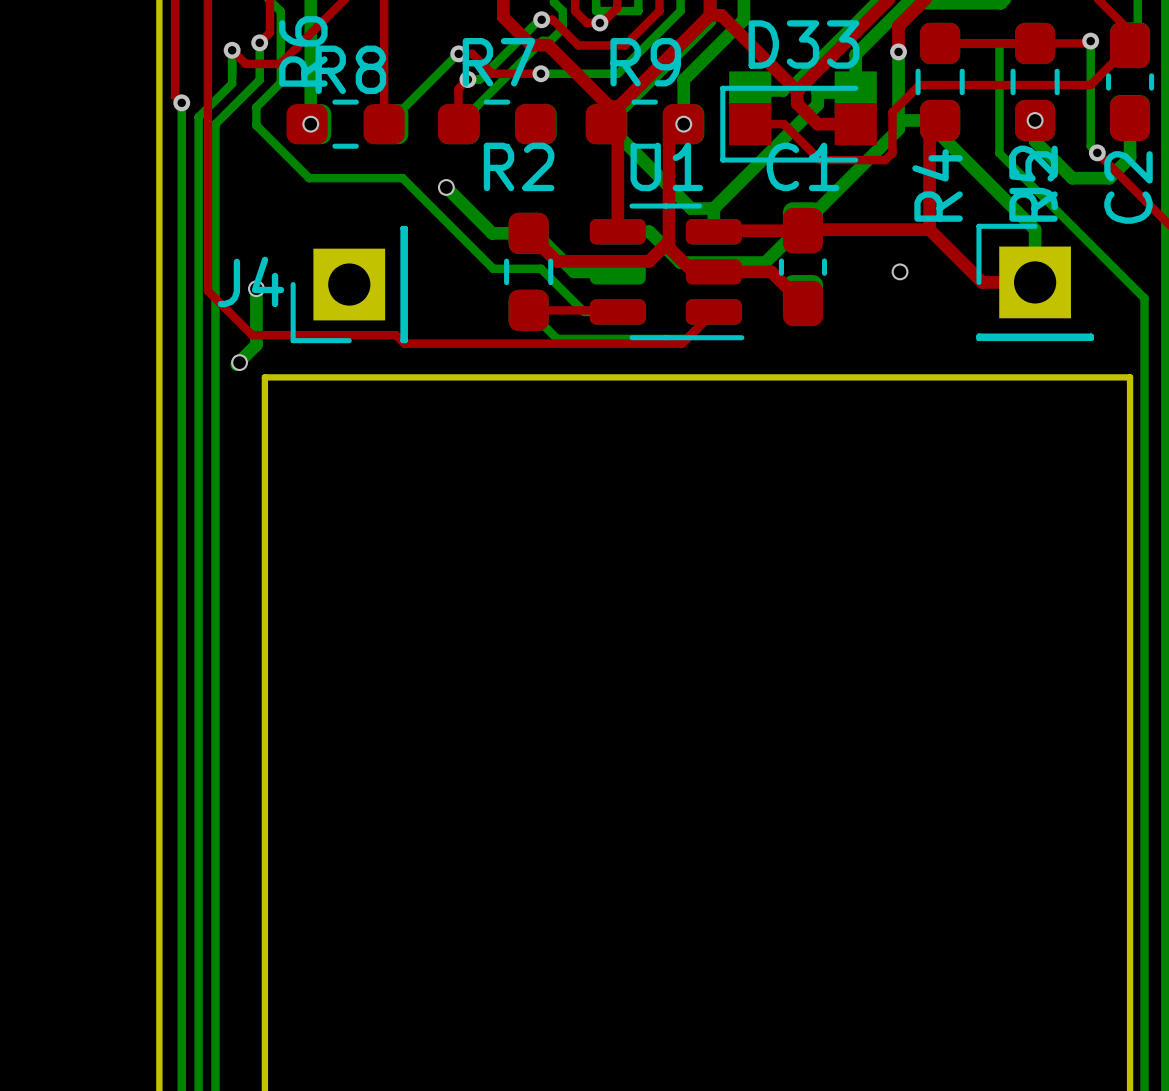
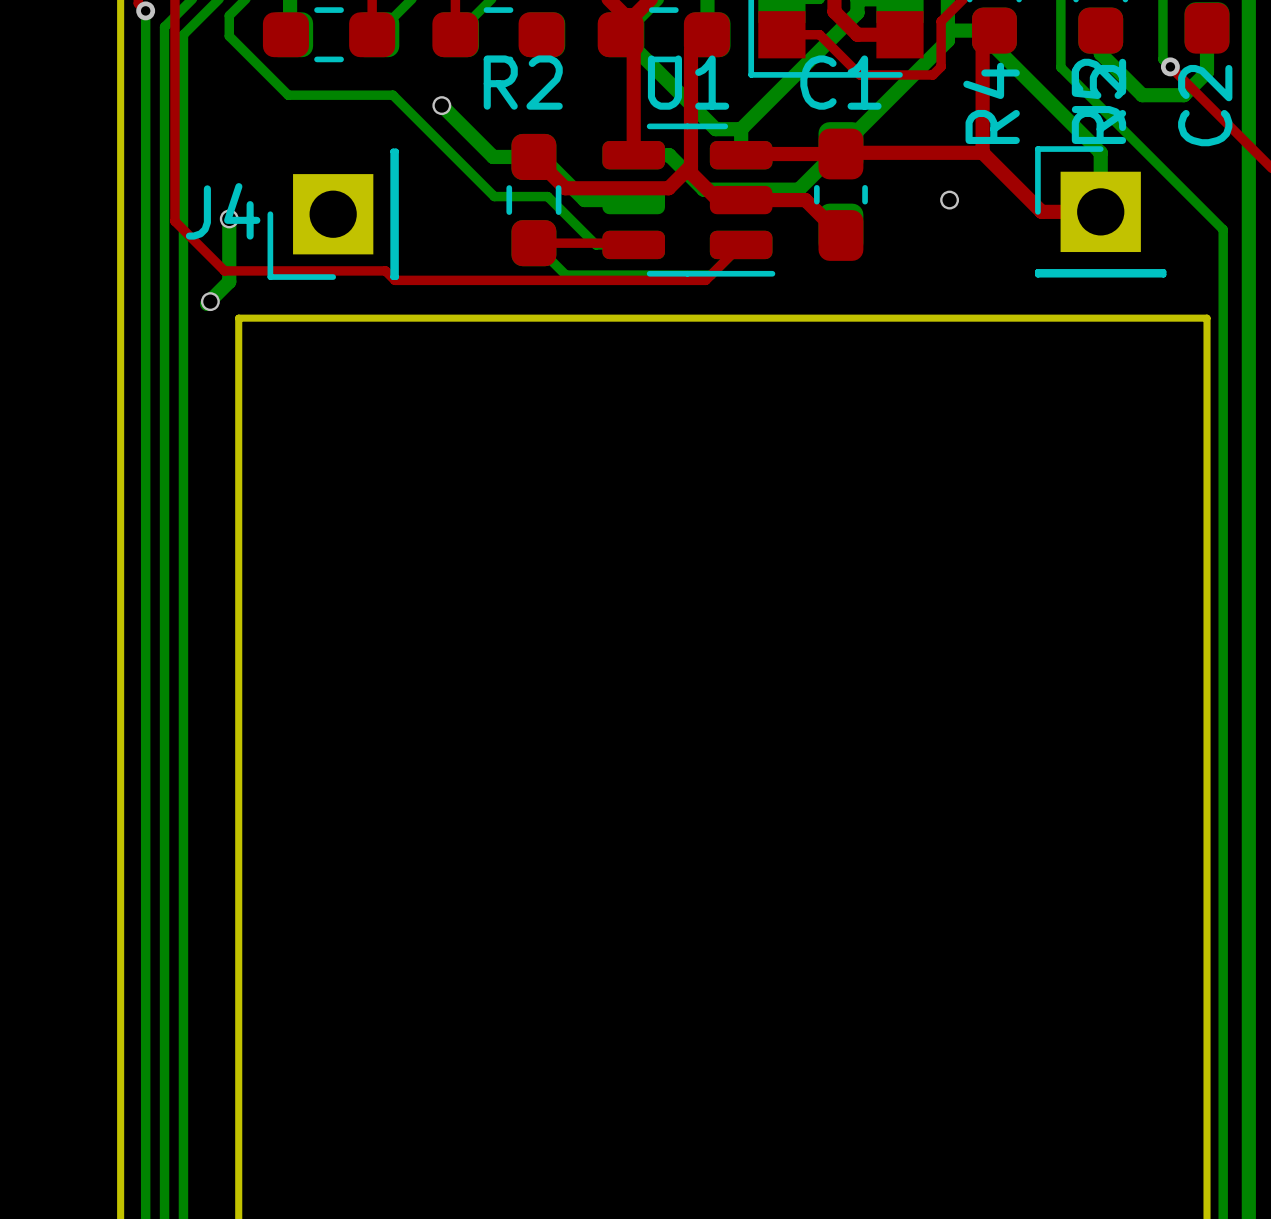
via: (1035, 120) -> none
via: (310, 124) -> none
via: (683, 124) -> none

